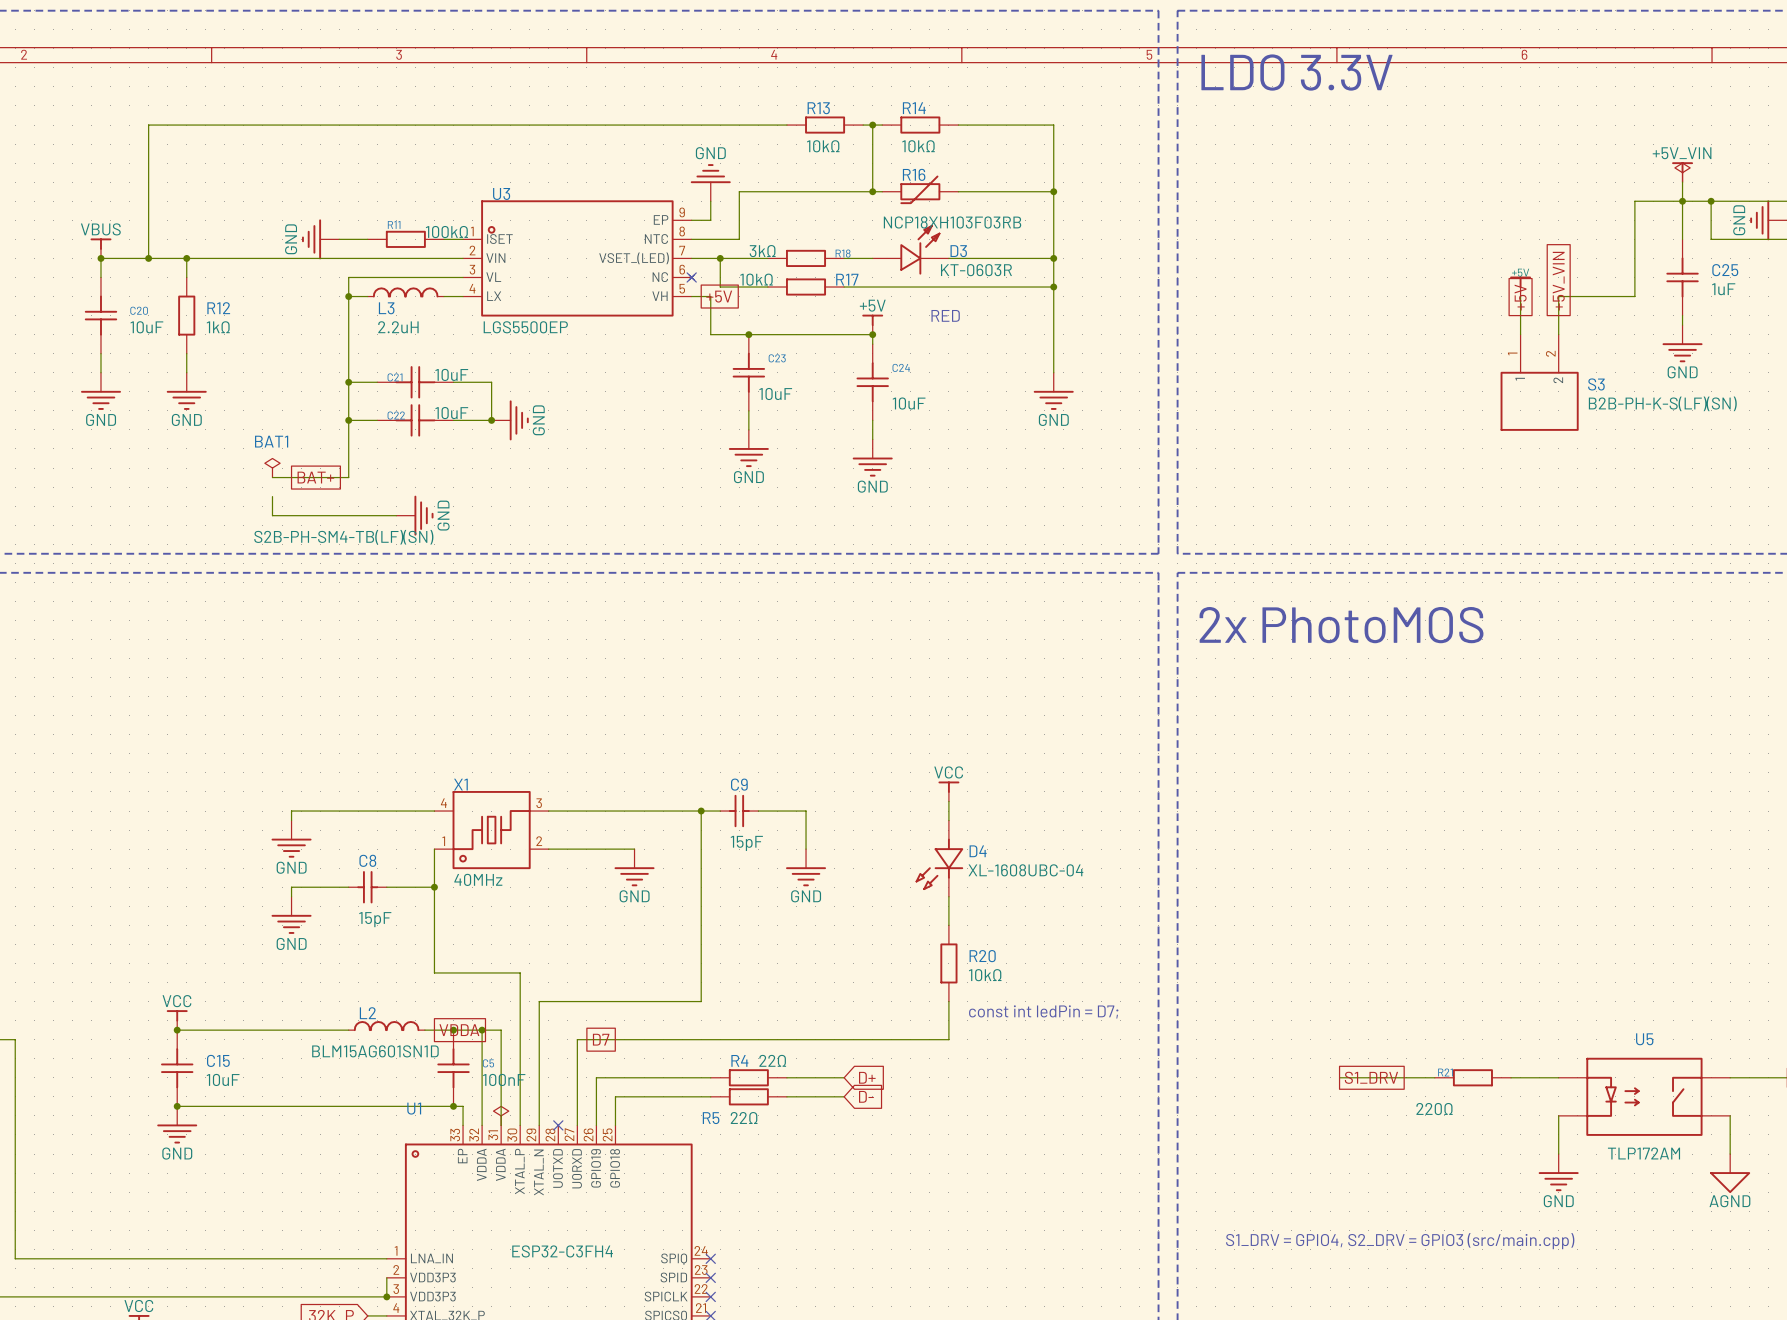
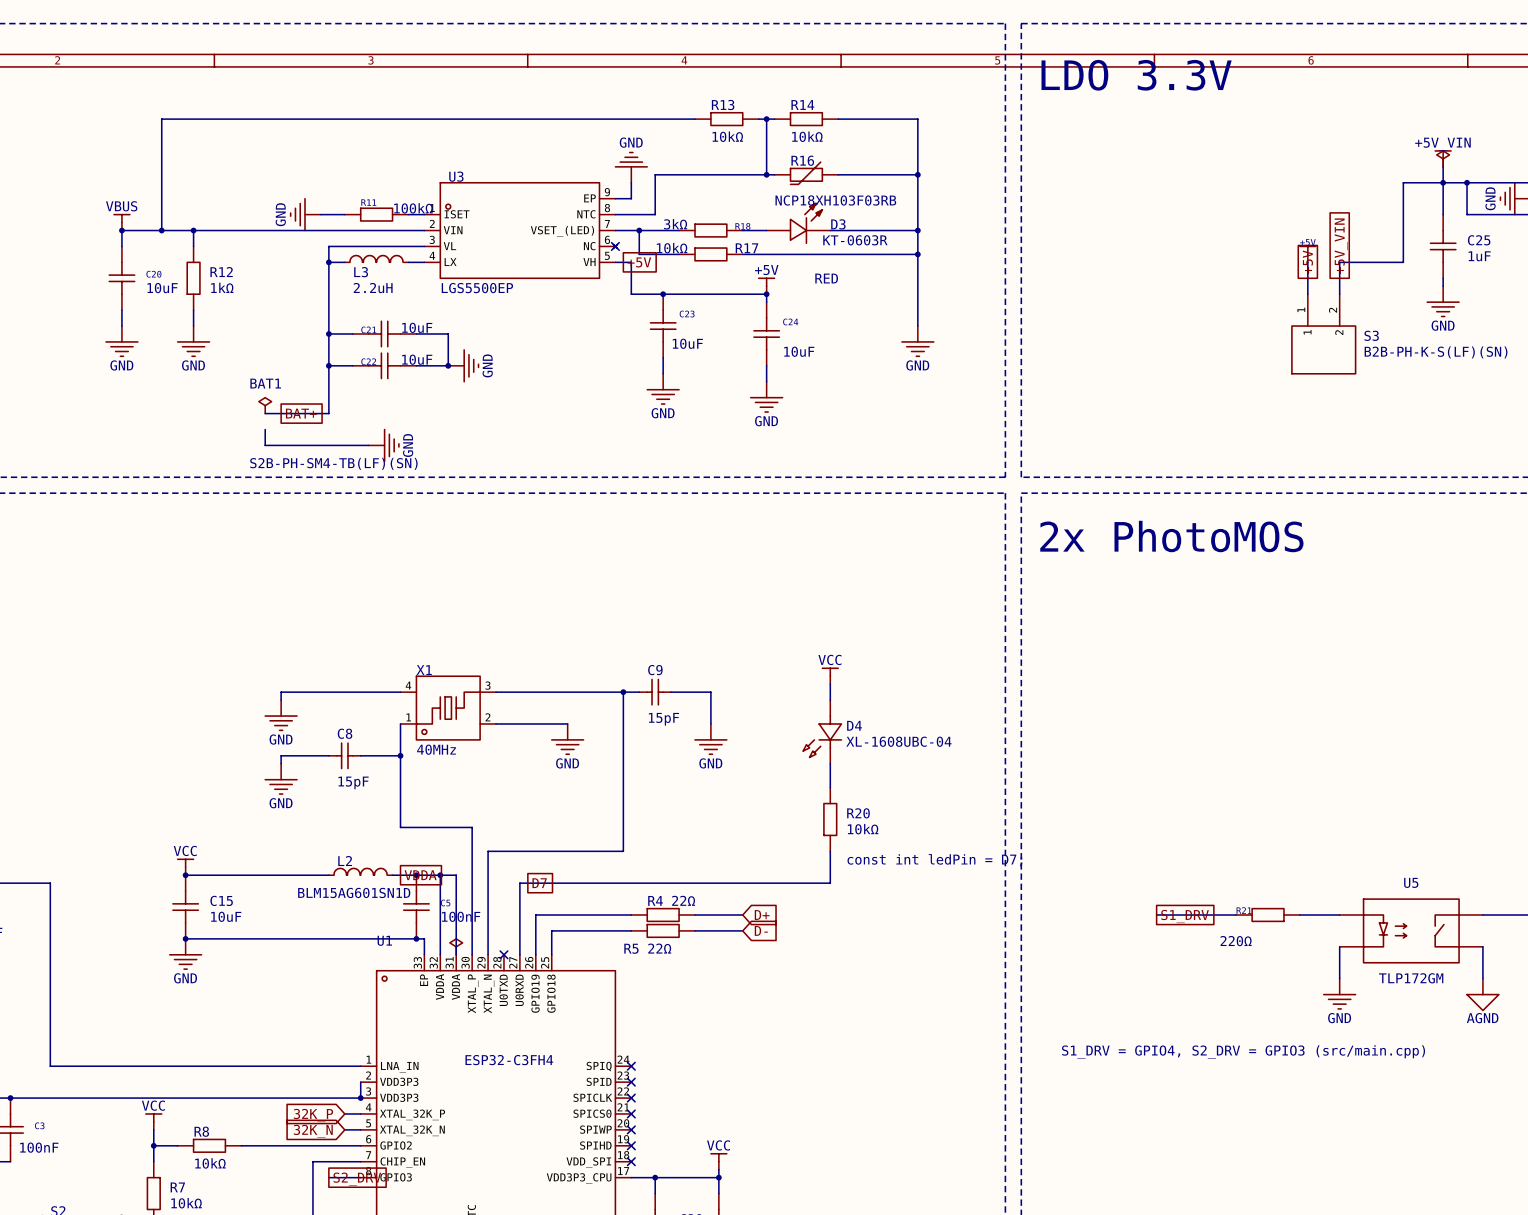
U5 value: TLP172AM (1644, 1153) -> TLP172GM (1411, 978)

